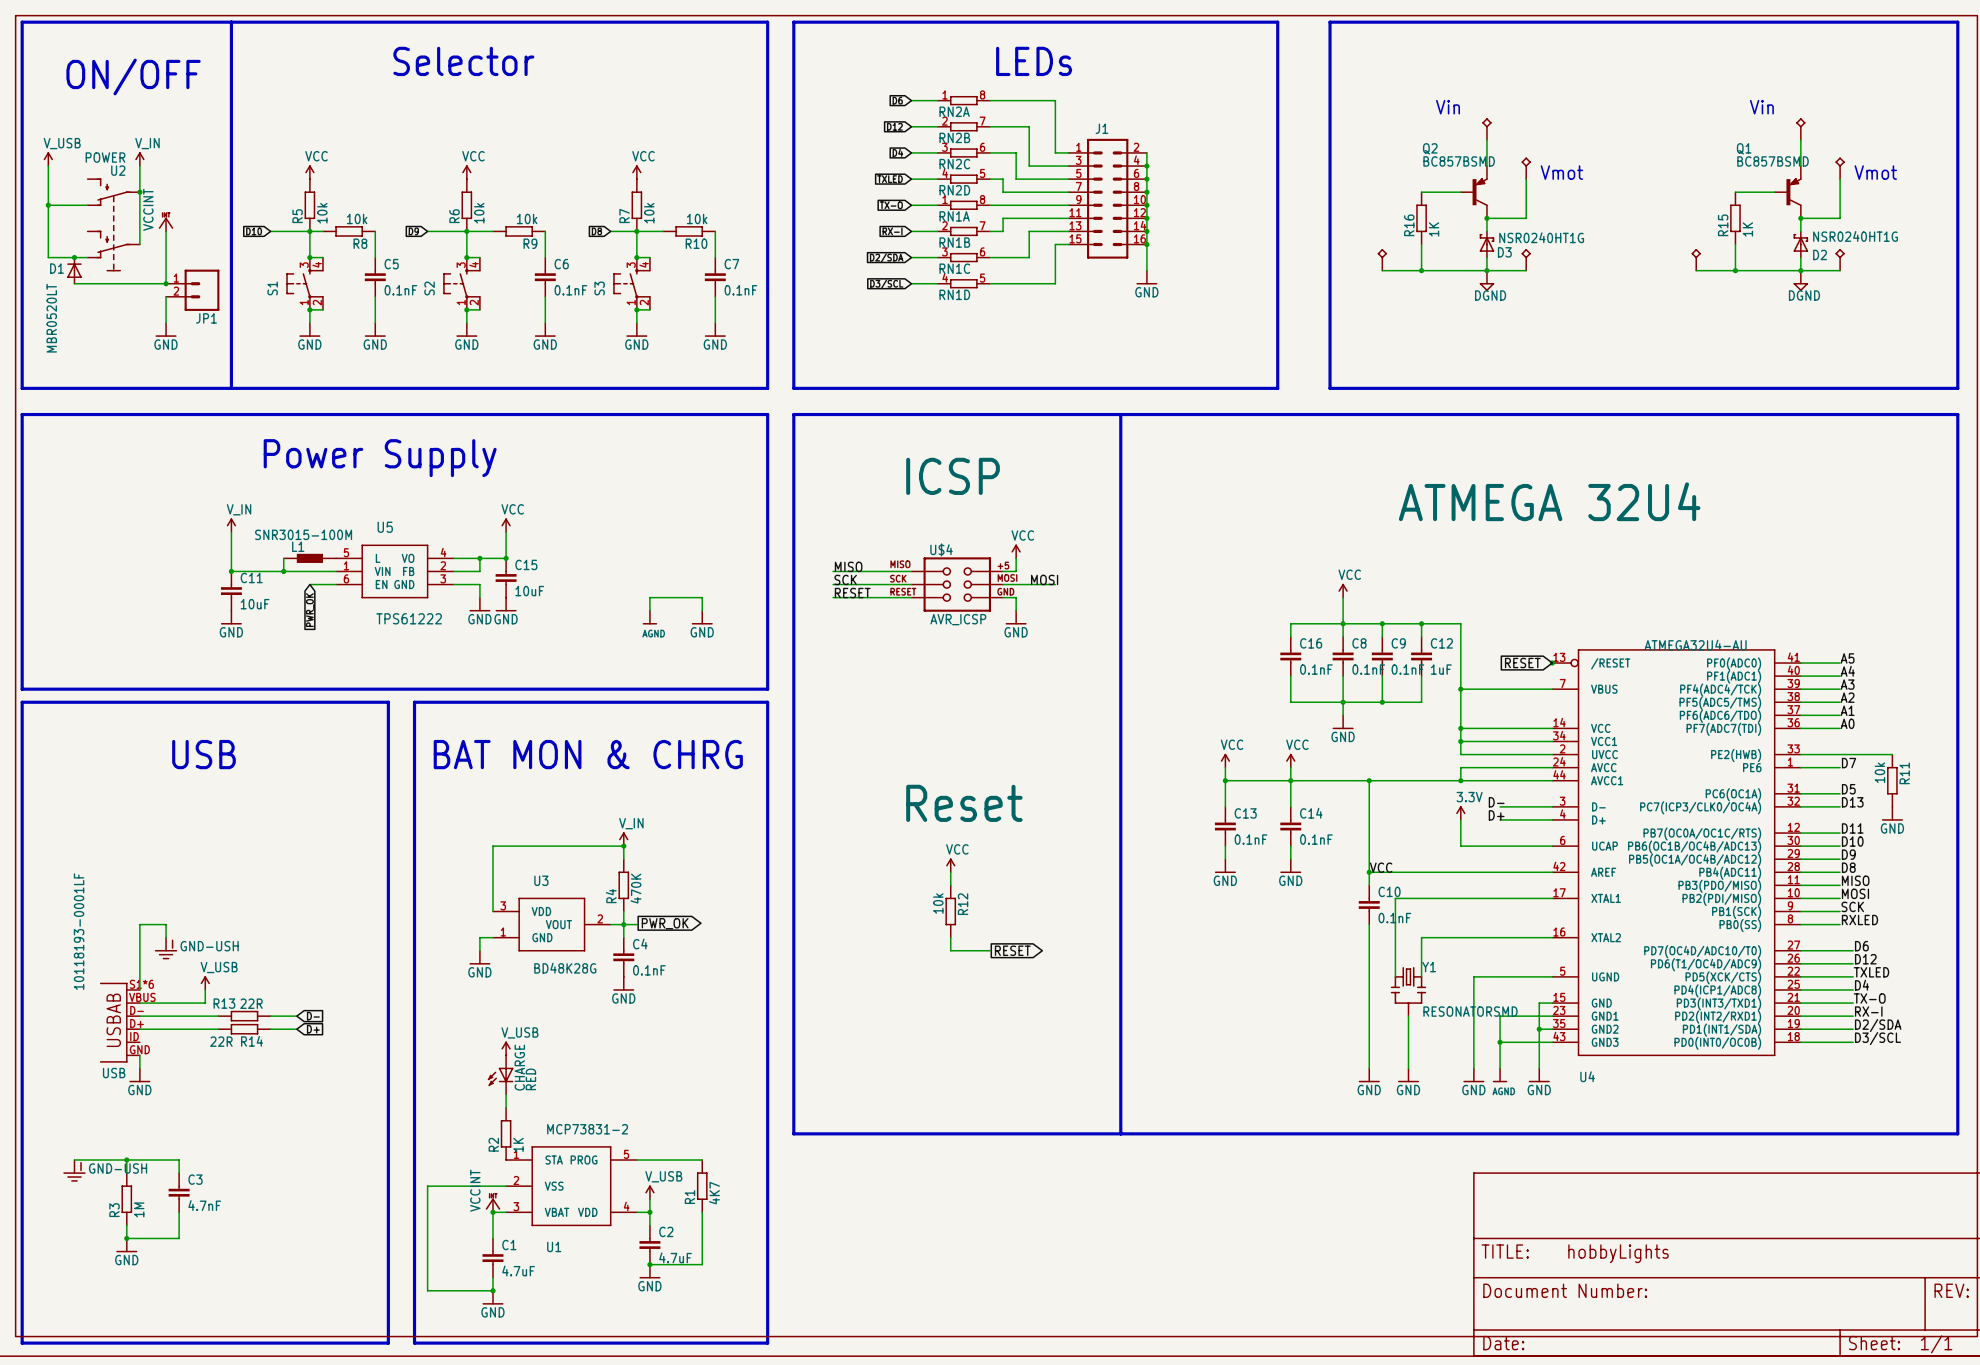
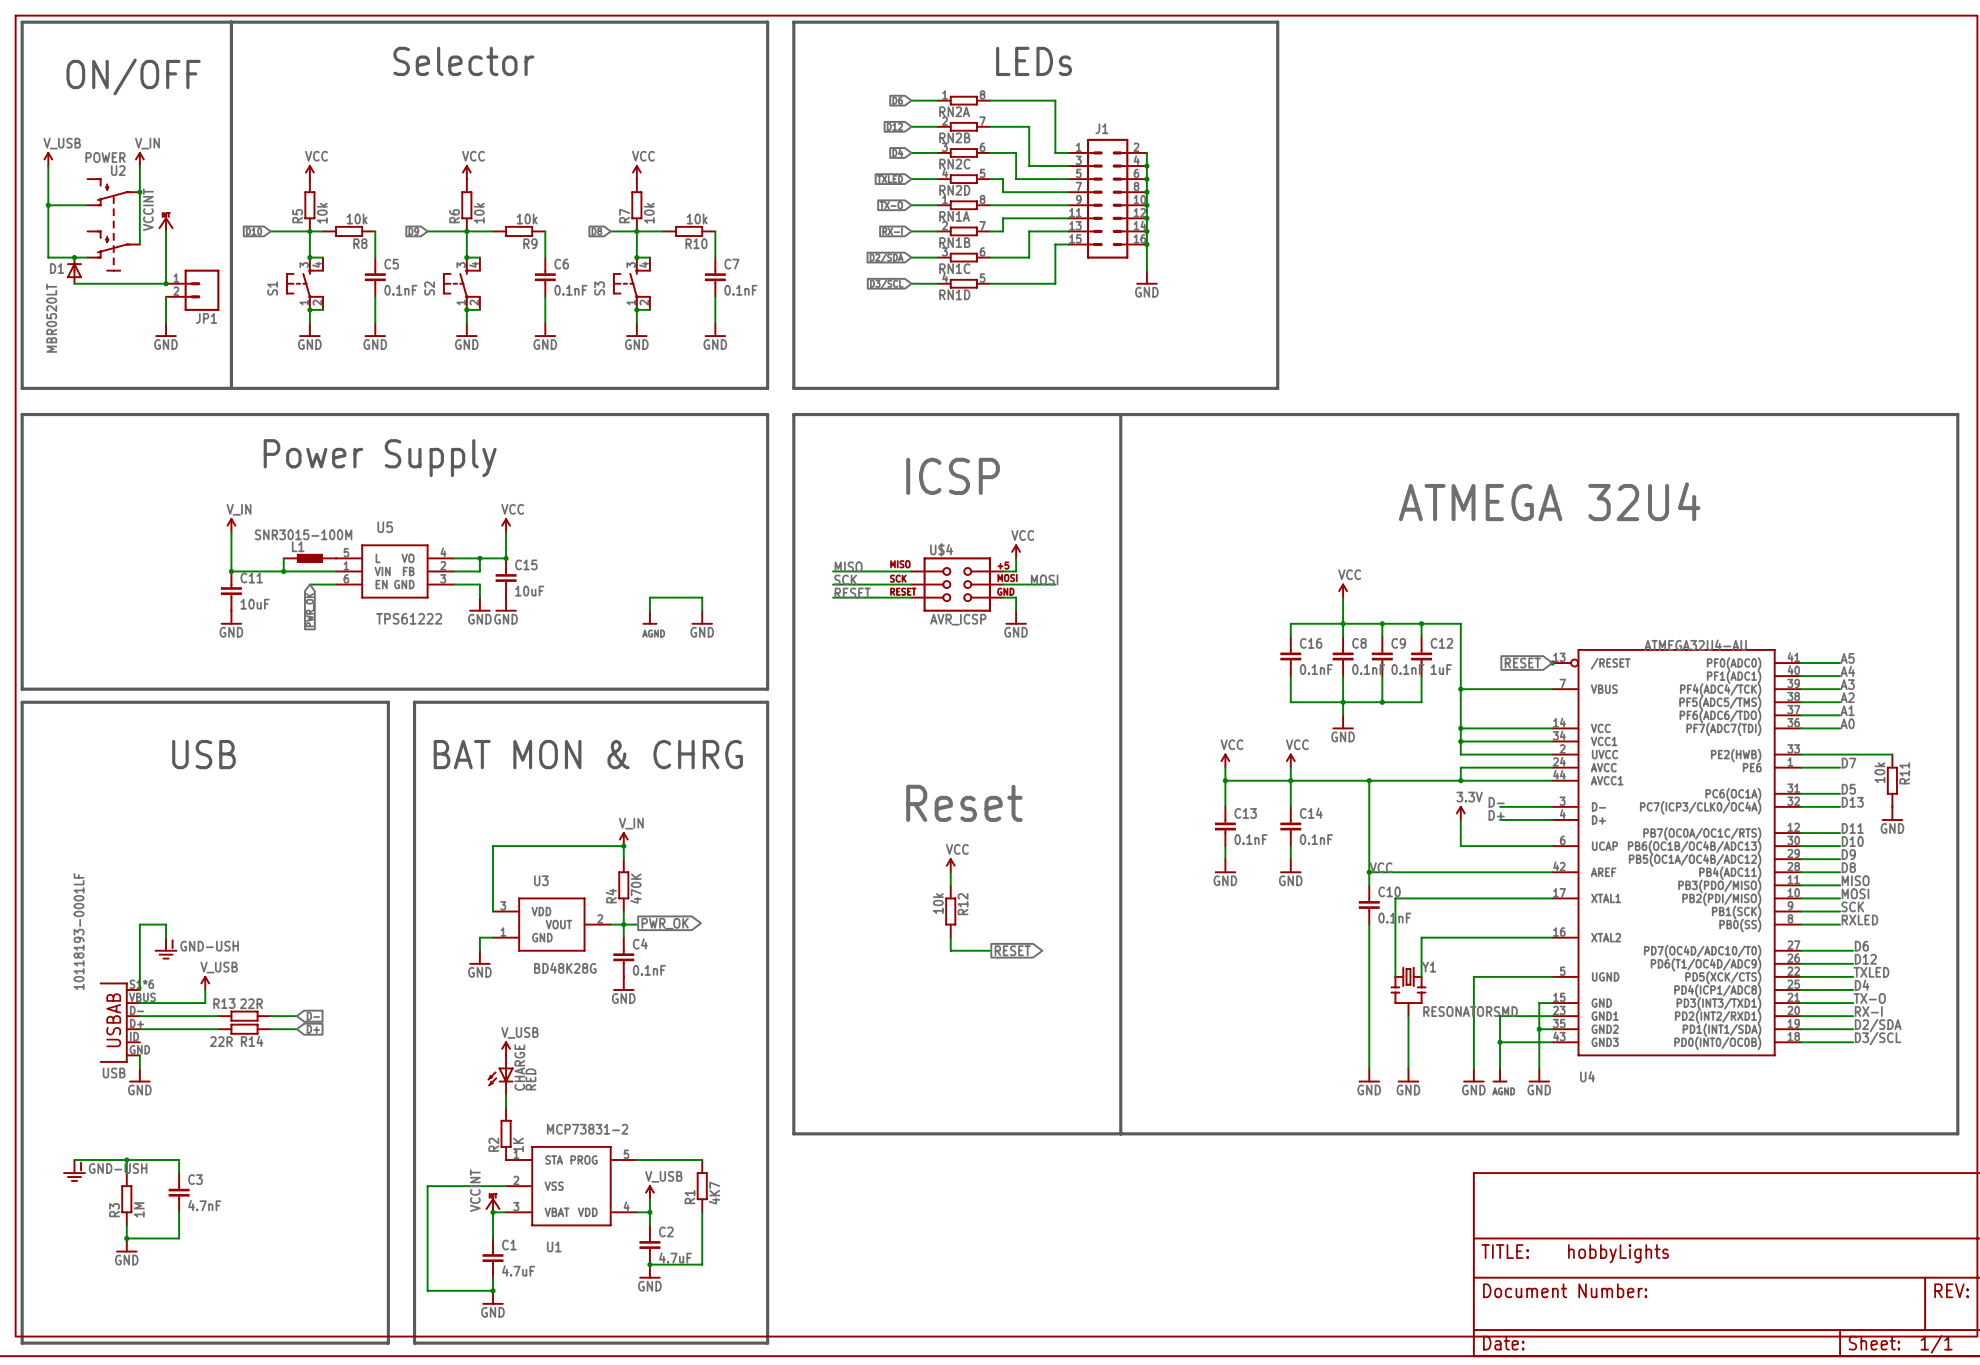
line: (1330, 22) (1957, 22) (1957, 388) (1330, 388) (1330, 22) -> none
text: Vin (1448, 107) -> none
text: Vin (1761, 107) -> none
part: (1486, 129) -> none
part: (1800, 129) -> none
wire: (1486, 139) (1486, 166) -> none
wire: (1800, 139) (1800, 166) -> none
part: (1526, 168) -> none
part: (1840, 168) -> none
text: Vmot (1561, 172) -> none
text: Vmot (1875, 172) -> none
wire: (1526, 179) (1526, 218) (1486, 218) (1486, 231) -> none
wire: (1840, 179) (1840, 218) (1800, 218) (1800, 231) -> none
wire: (1421, 192) (1460, 192) -> none
Q2: BC857BSMD (1474, 192) -> none
wire: (1735, 192) (1774, 192) -> none
Q1: BC857BSMD (1787, 192) -> none
R16: 1K (1421, 218) -> none
junction: (1486, 218) -> none
R15: 1K (1735, 218) -> none
junction: (1800, 218) -> none
wire: (1421, 244) (1421, 270) -> none
D3: NSR0240HT1G (1486, 244) -> none
wire: (1735, 244) (1735, 270) -> none
D2: NSR0240HT1G (1800, 244) -> none
wire: (1486, 257) (1486, 270) -> none
wire: (1800, 257) (1800, 270) -> none
part: (1382, 259) -> none
part: (1526, 259) -> none
part: (1696, 259) -> none
part: (1840, 259) -> none
wire: (1382, 270) (1526, 270) -> none
junction: (1421, 270) -> none
junction: (1486, 270) -> none
wire: (1696, 270) (1840, 270) -> none
junction: (1735, 270) -> none
junction: (1800, 270) -> none
power symbol: DGND (1486, 280) -> none
power symbol: DGND (1800, 280) -> none

